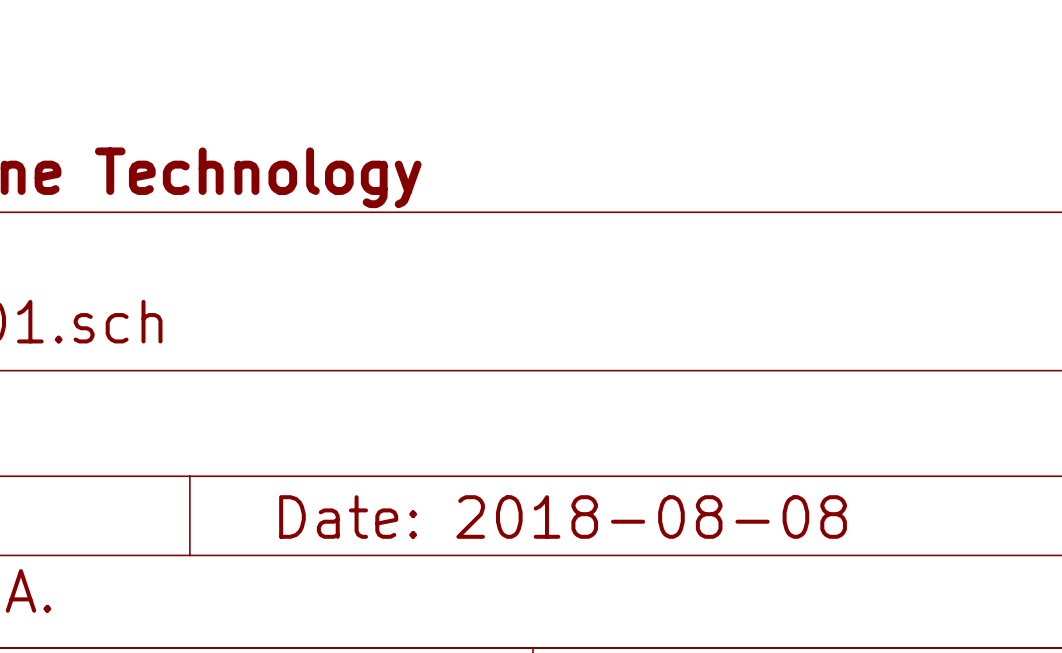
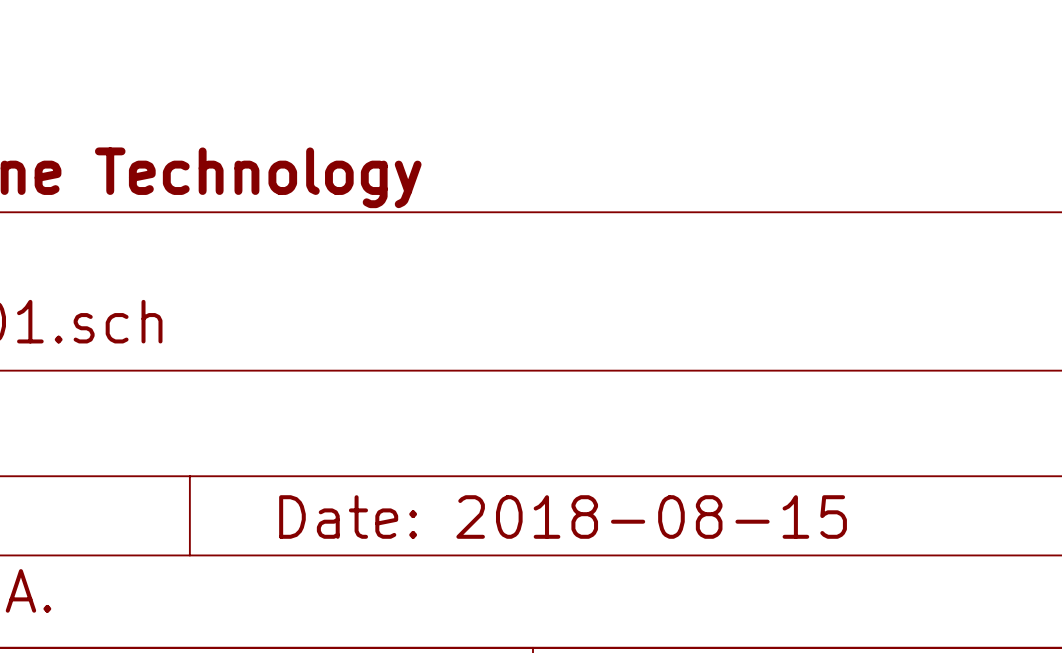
title block: Date: 2018-08-08 (563, 517) -> Date: 2018-08-15 (563, 517)

